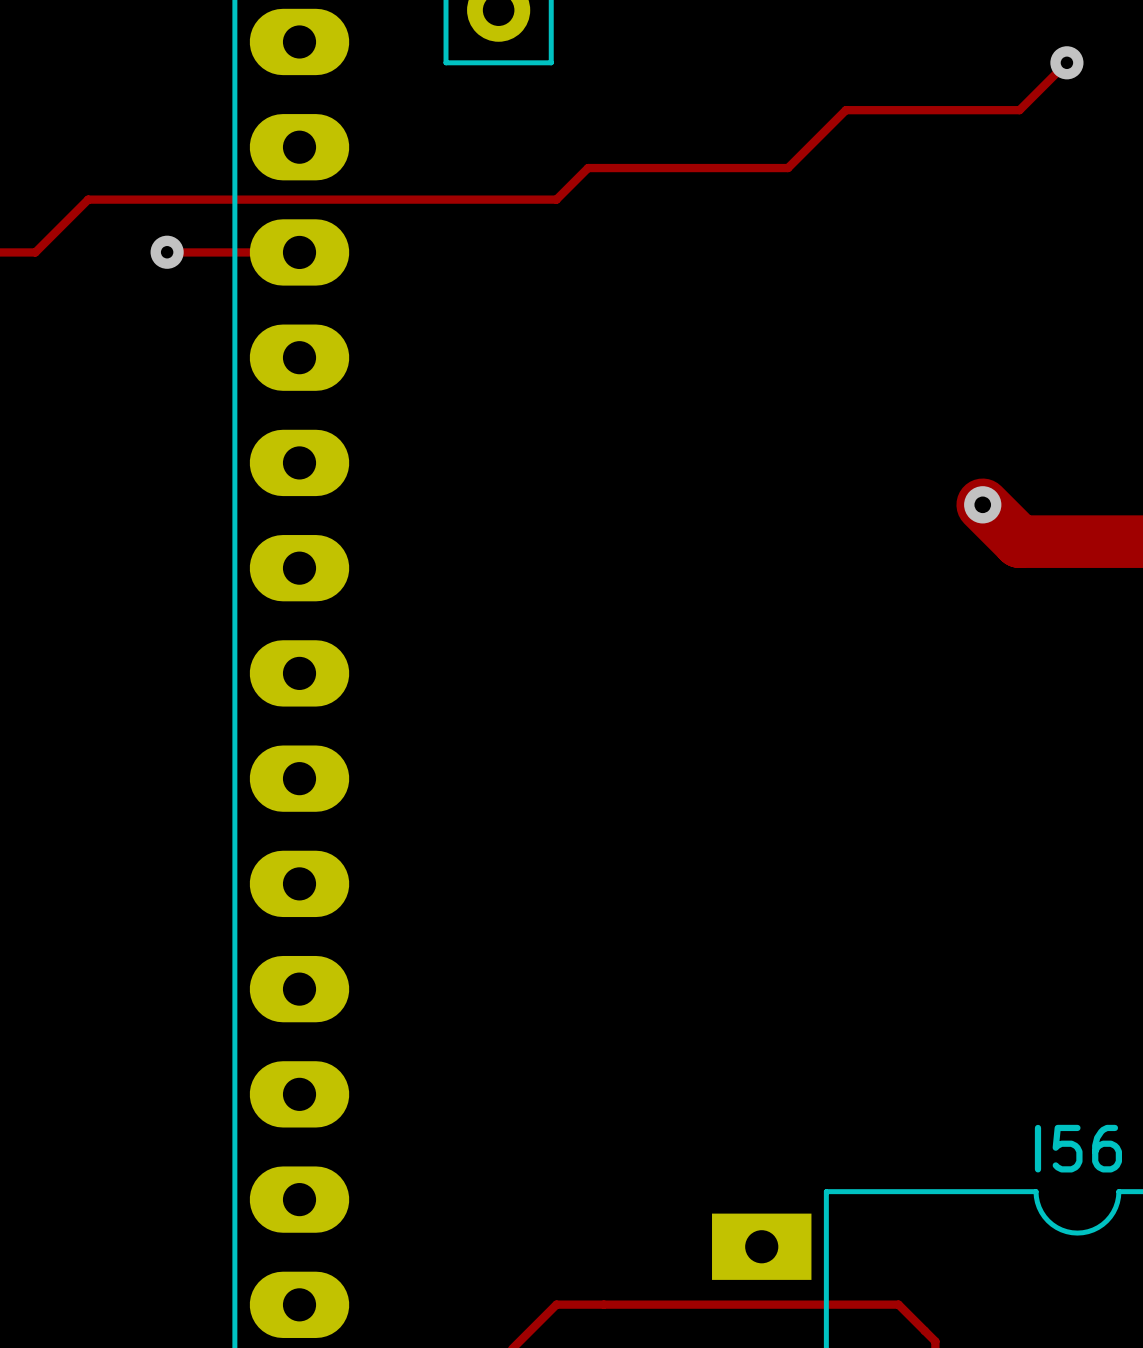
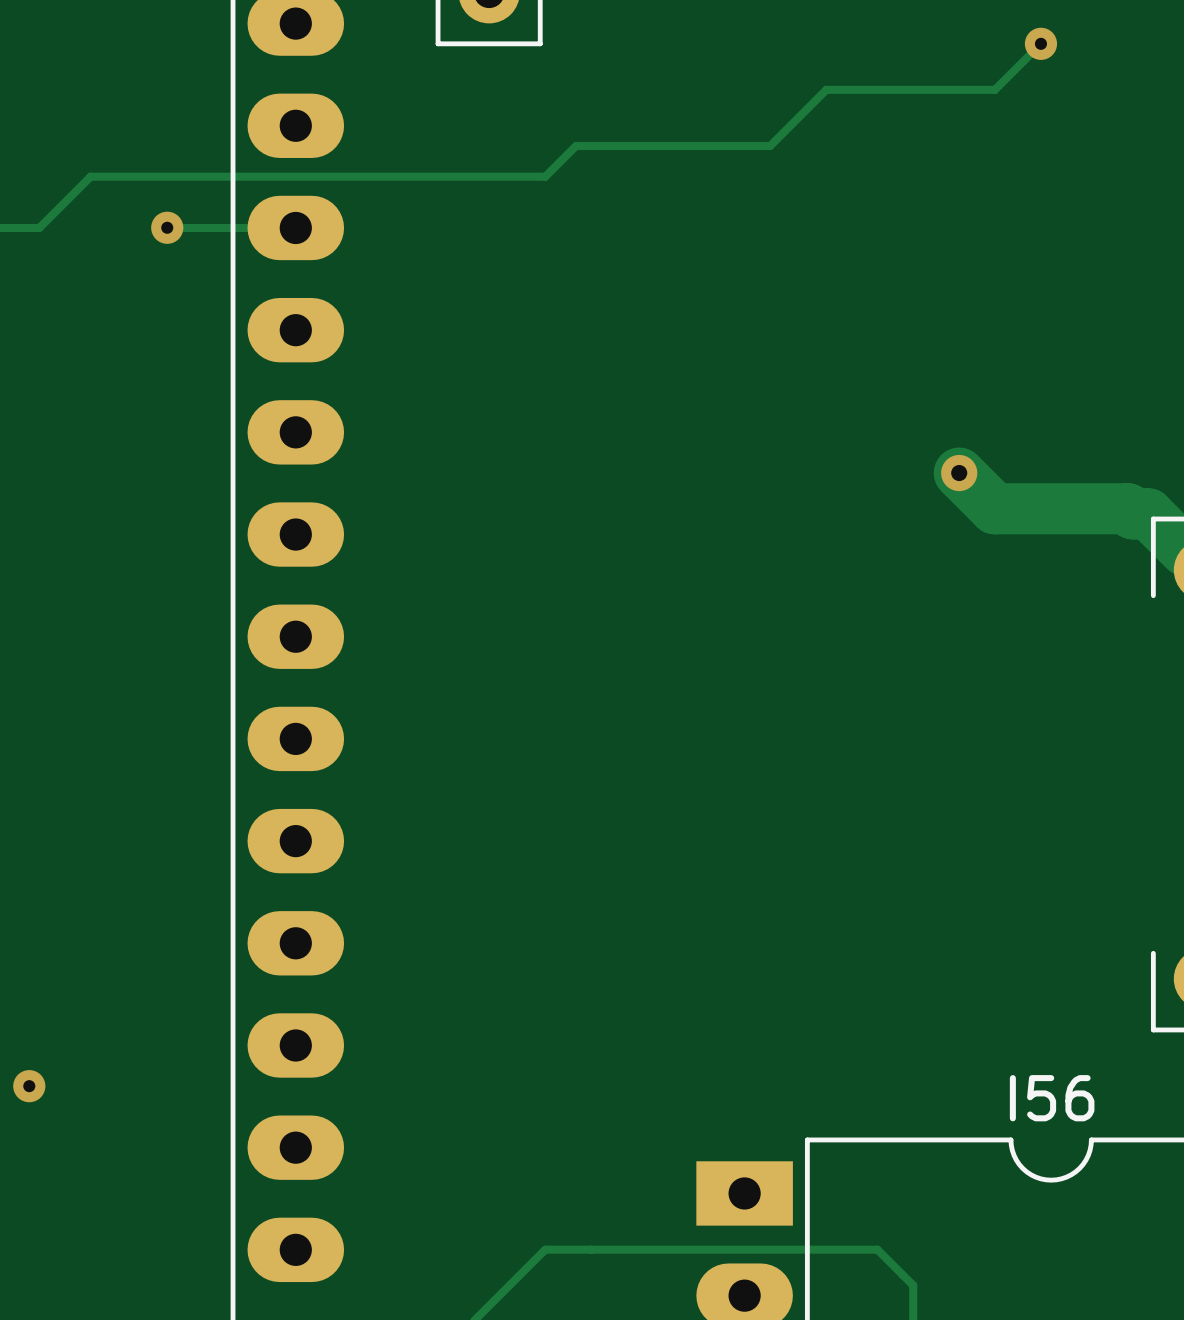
via: none -> (29, 1086)

